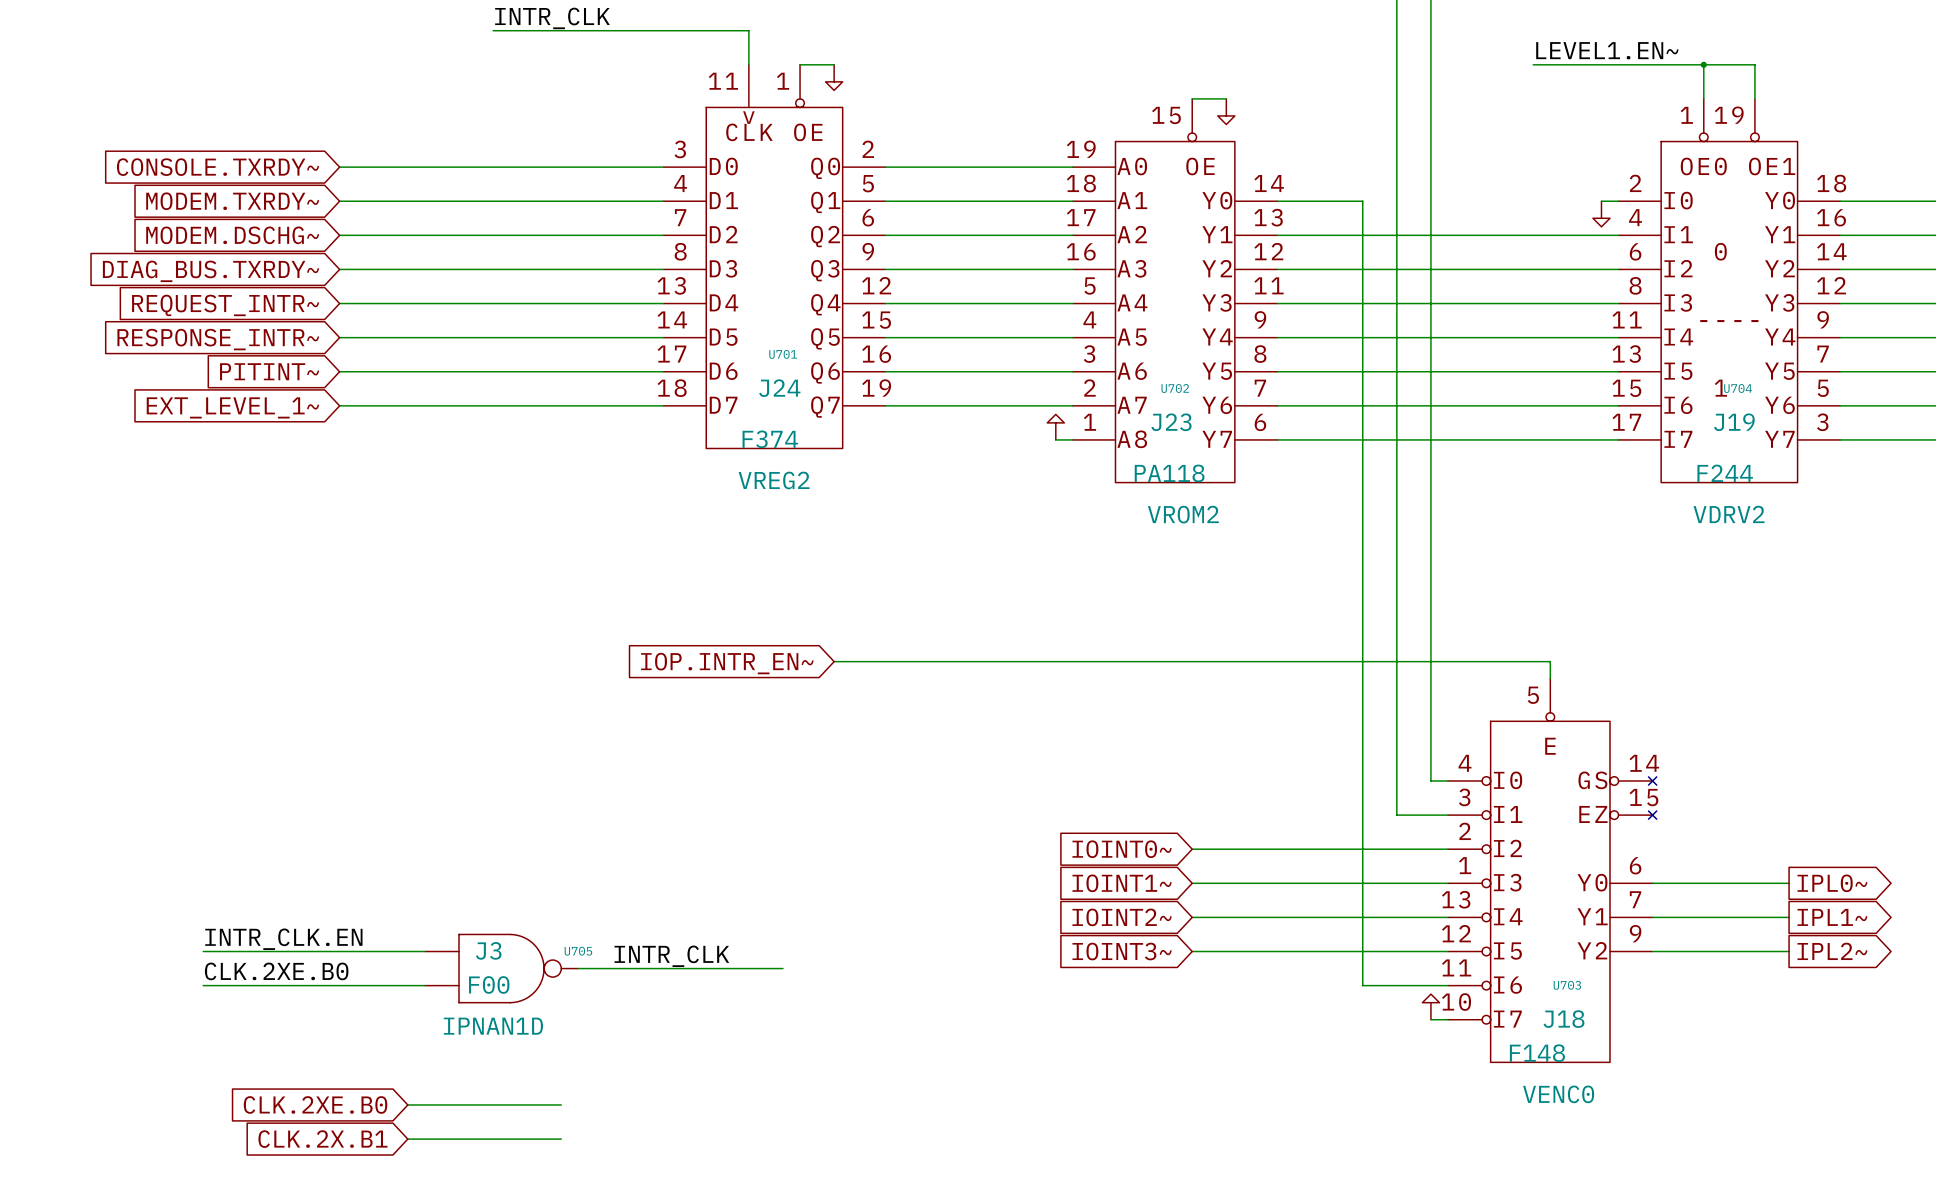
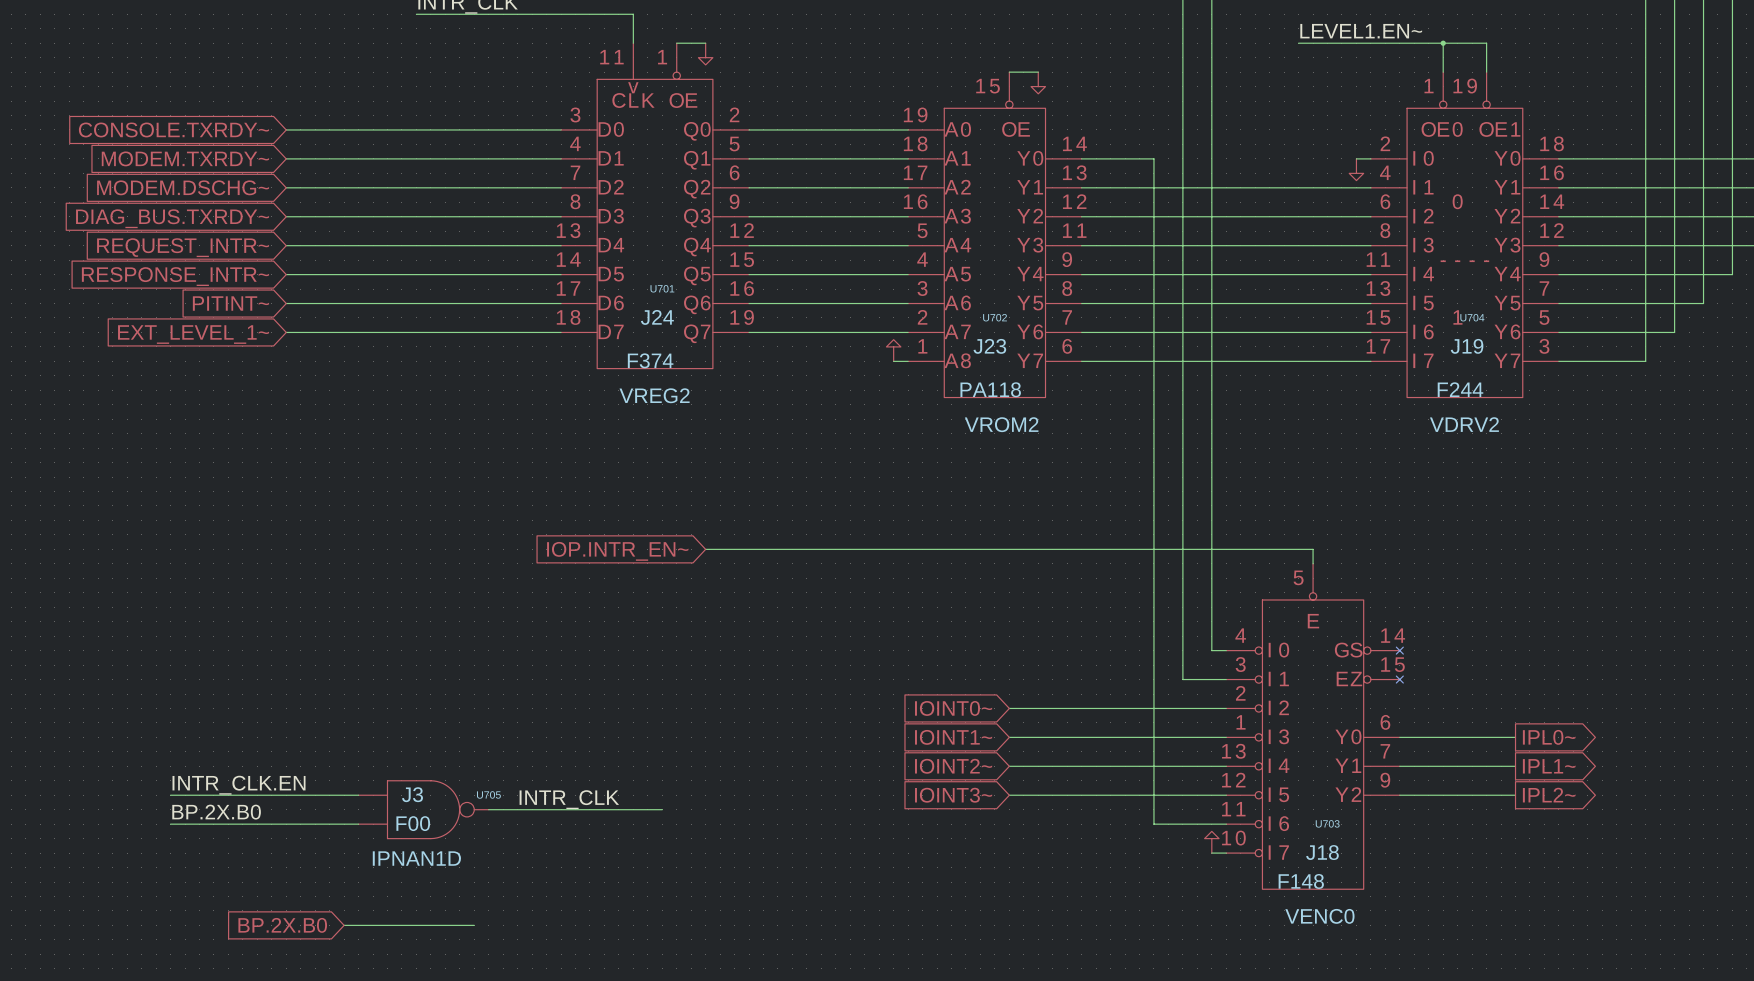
label: CLK.2XE.B0 (276, 971) -> BP.2X.B0 (216, 812)
global label: CLK.2XE.B0 (315, 1104) -> BP.2X.B0 (282, 925)
global label: CLK.2X.B1 (322, 1139) -> none
wire: (407, 1139) (561, 1139) -> none

